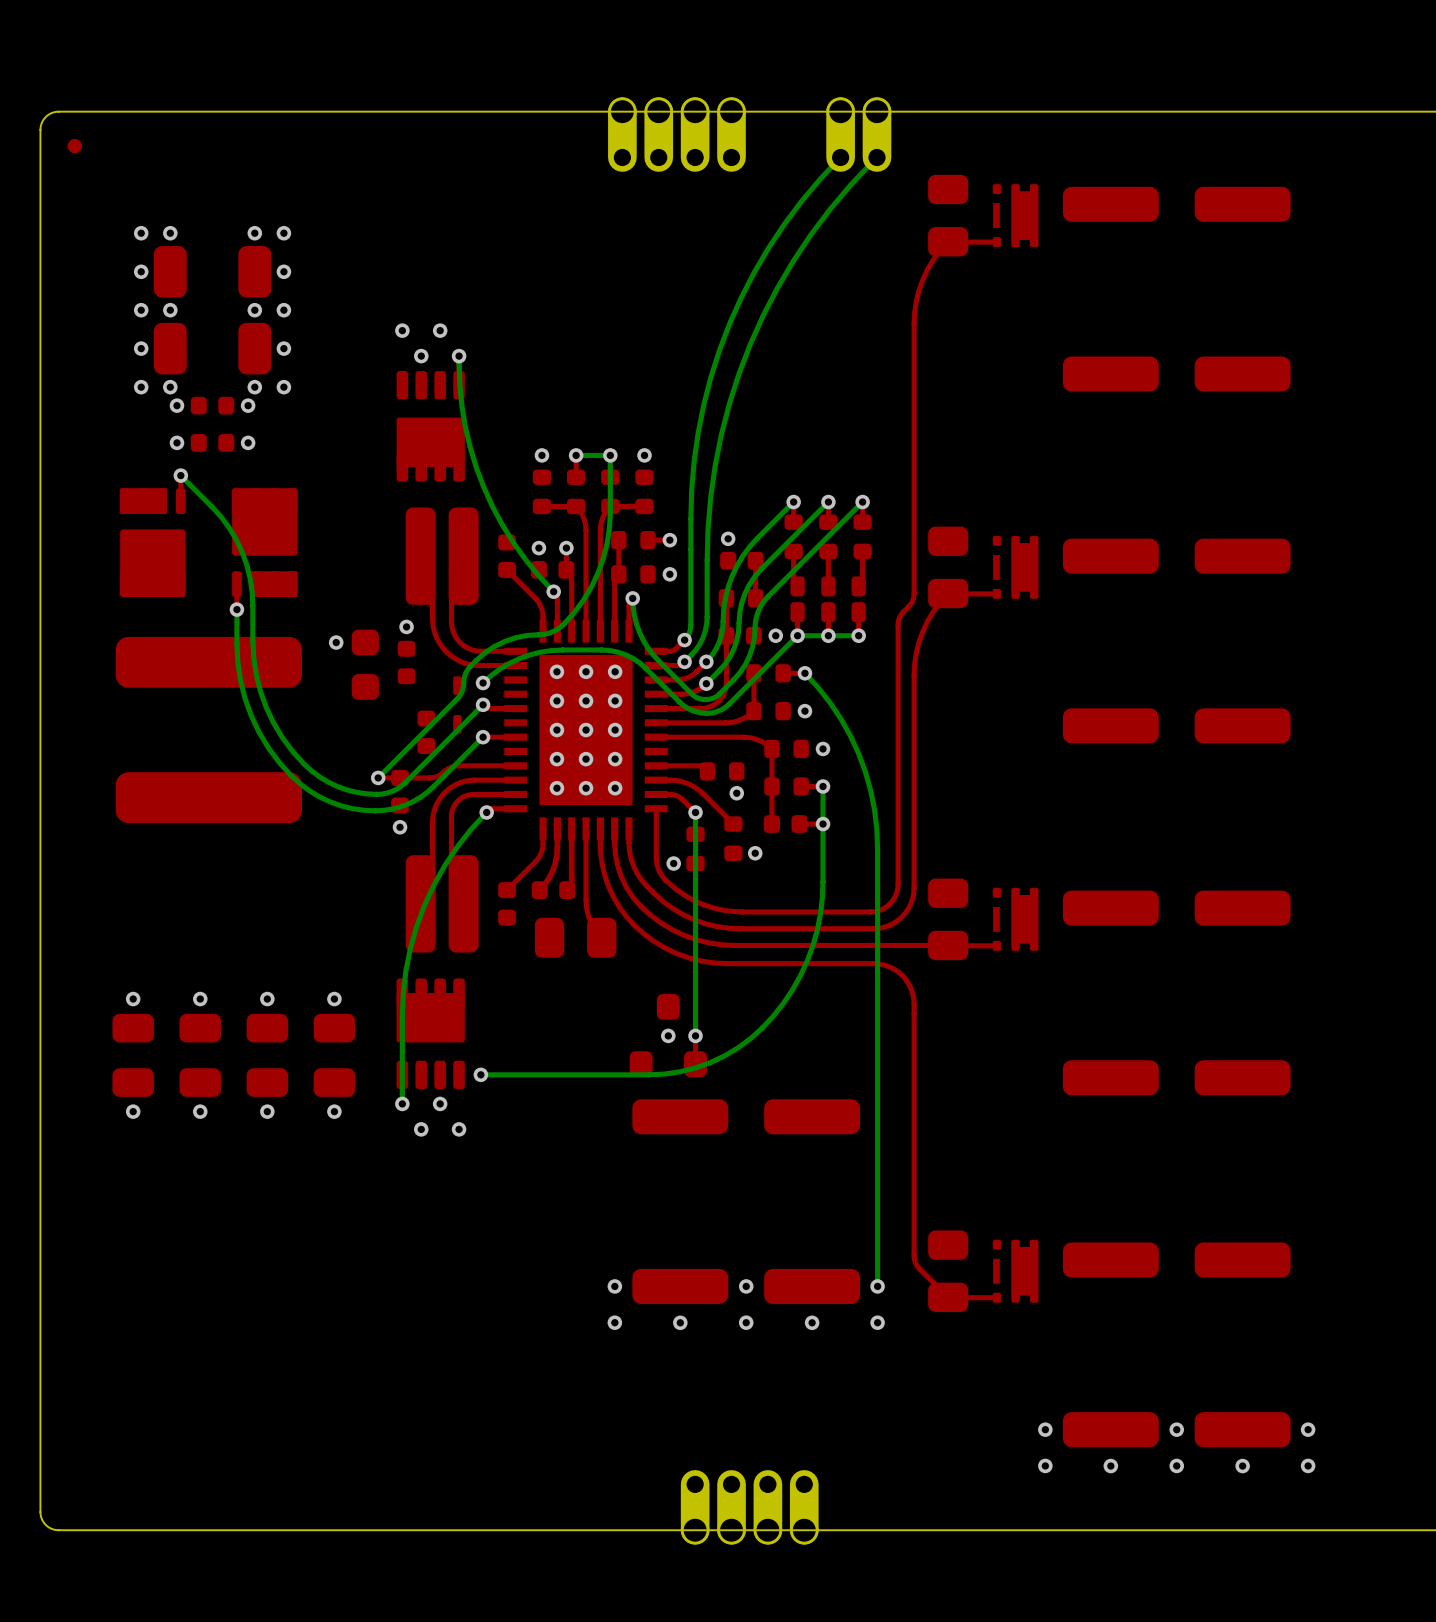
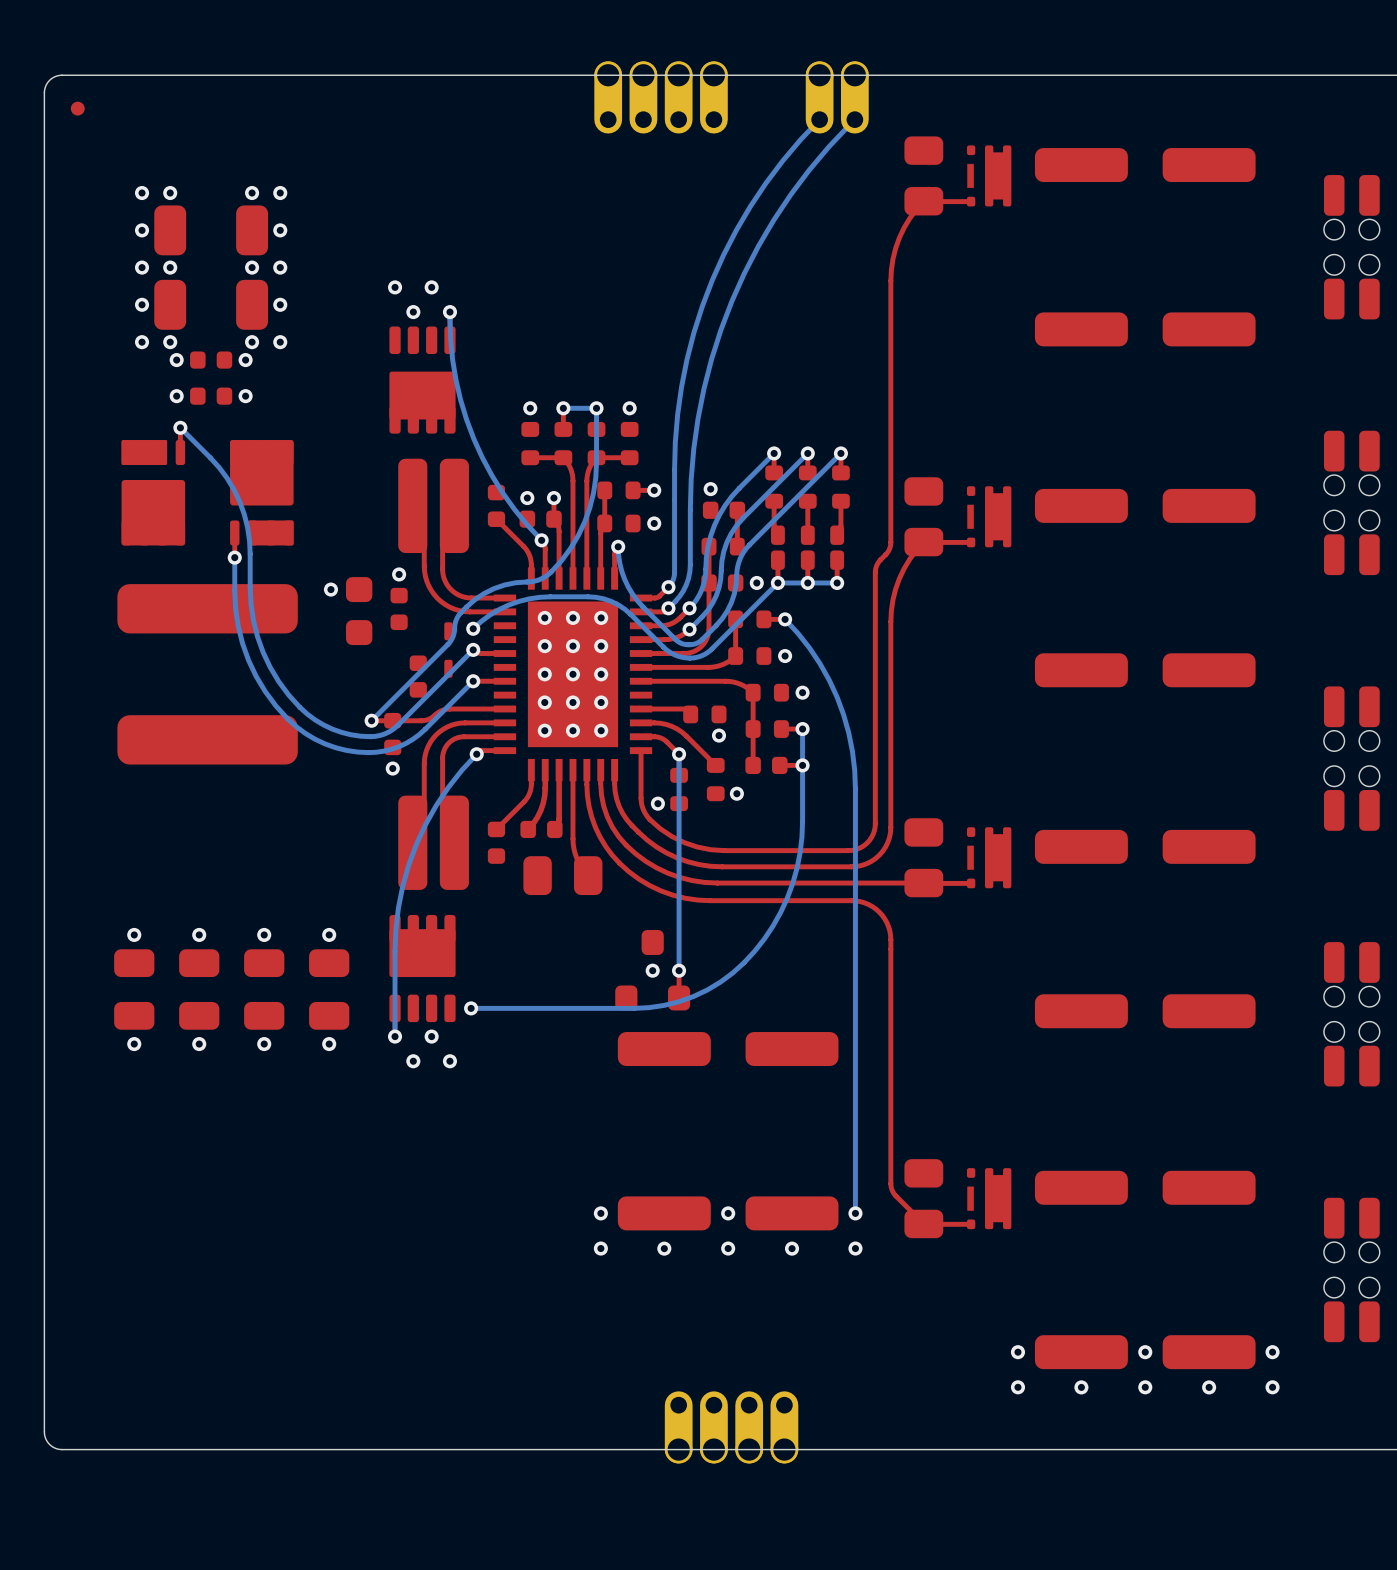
part: none -> (1351, 247)
part: none -> (1351, 502)
part: none -> (1351, 758)
part: none -> (1351, 1014)
part: none -> (1351, 1269)

